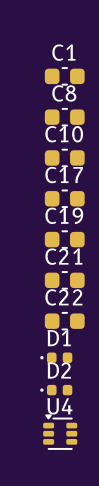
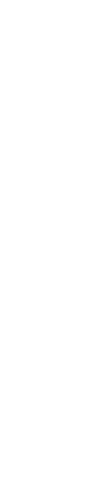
C1: (64, 76) -> none
C8: (64, 117) -> none
C10: (64, 157) -> none
C17: (64, 198) -> none
C19: (64, 239) -> none
C21: (64, 280) -> none
C22: (64, 321) -> none
D1: (56, 357) -> none
D2: (56, 390) -> none
U4: (60, 432) -> none

